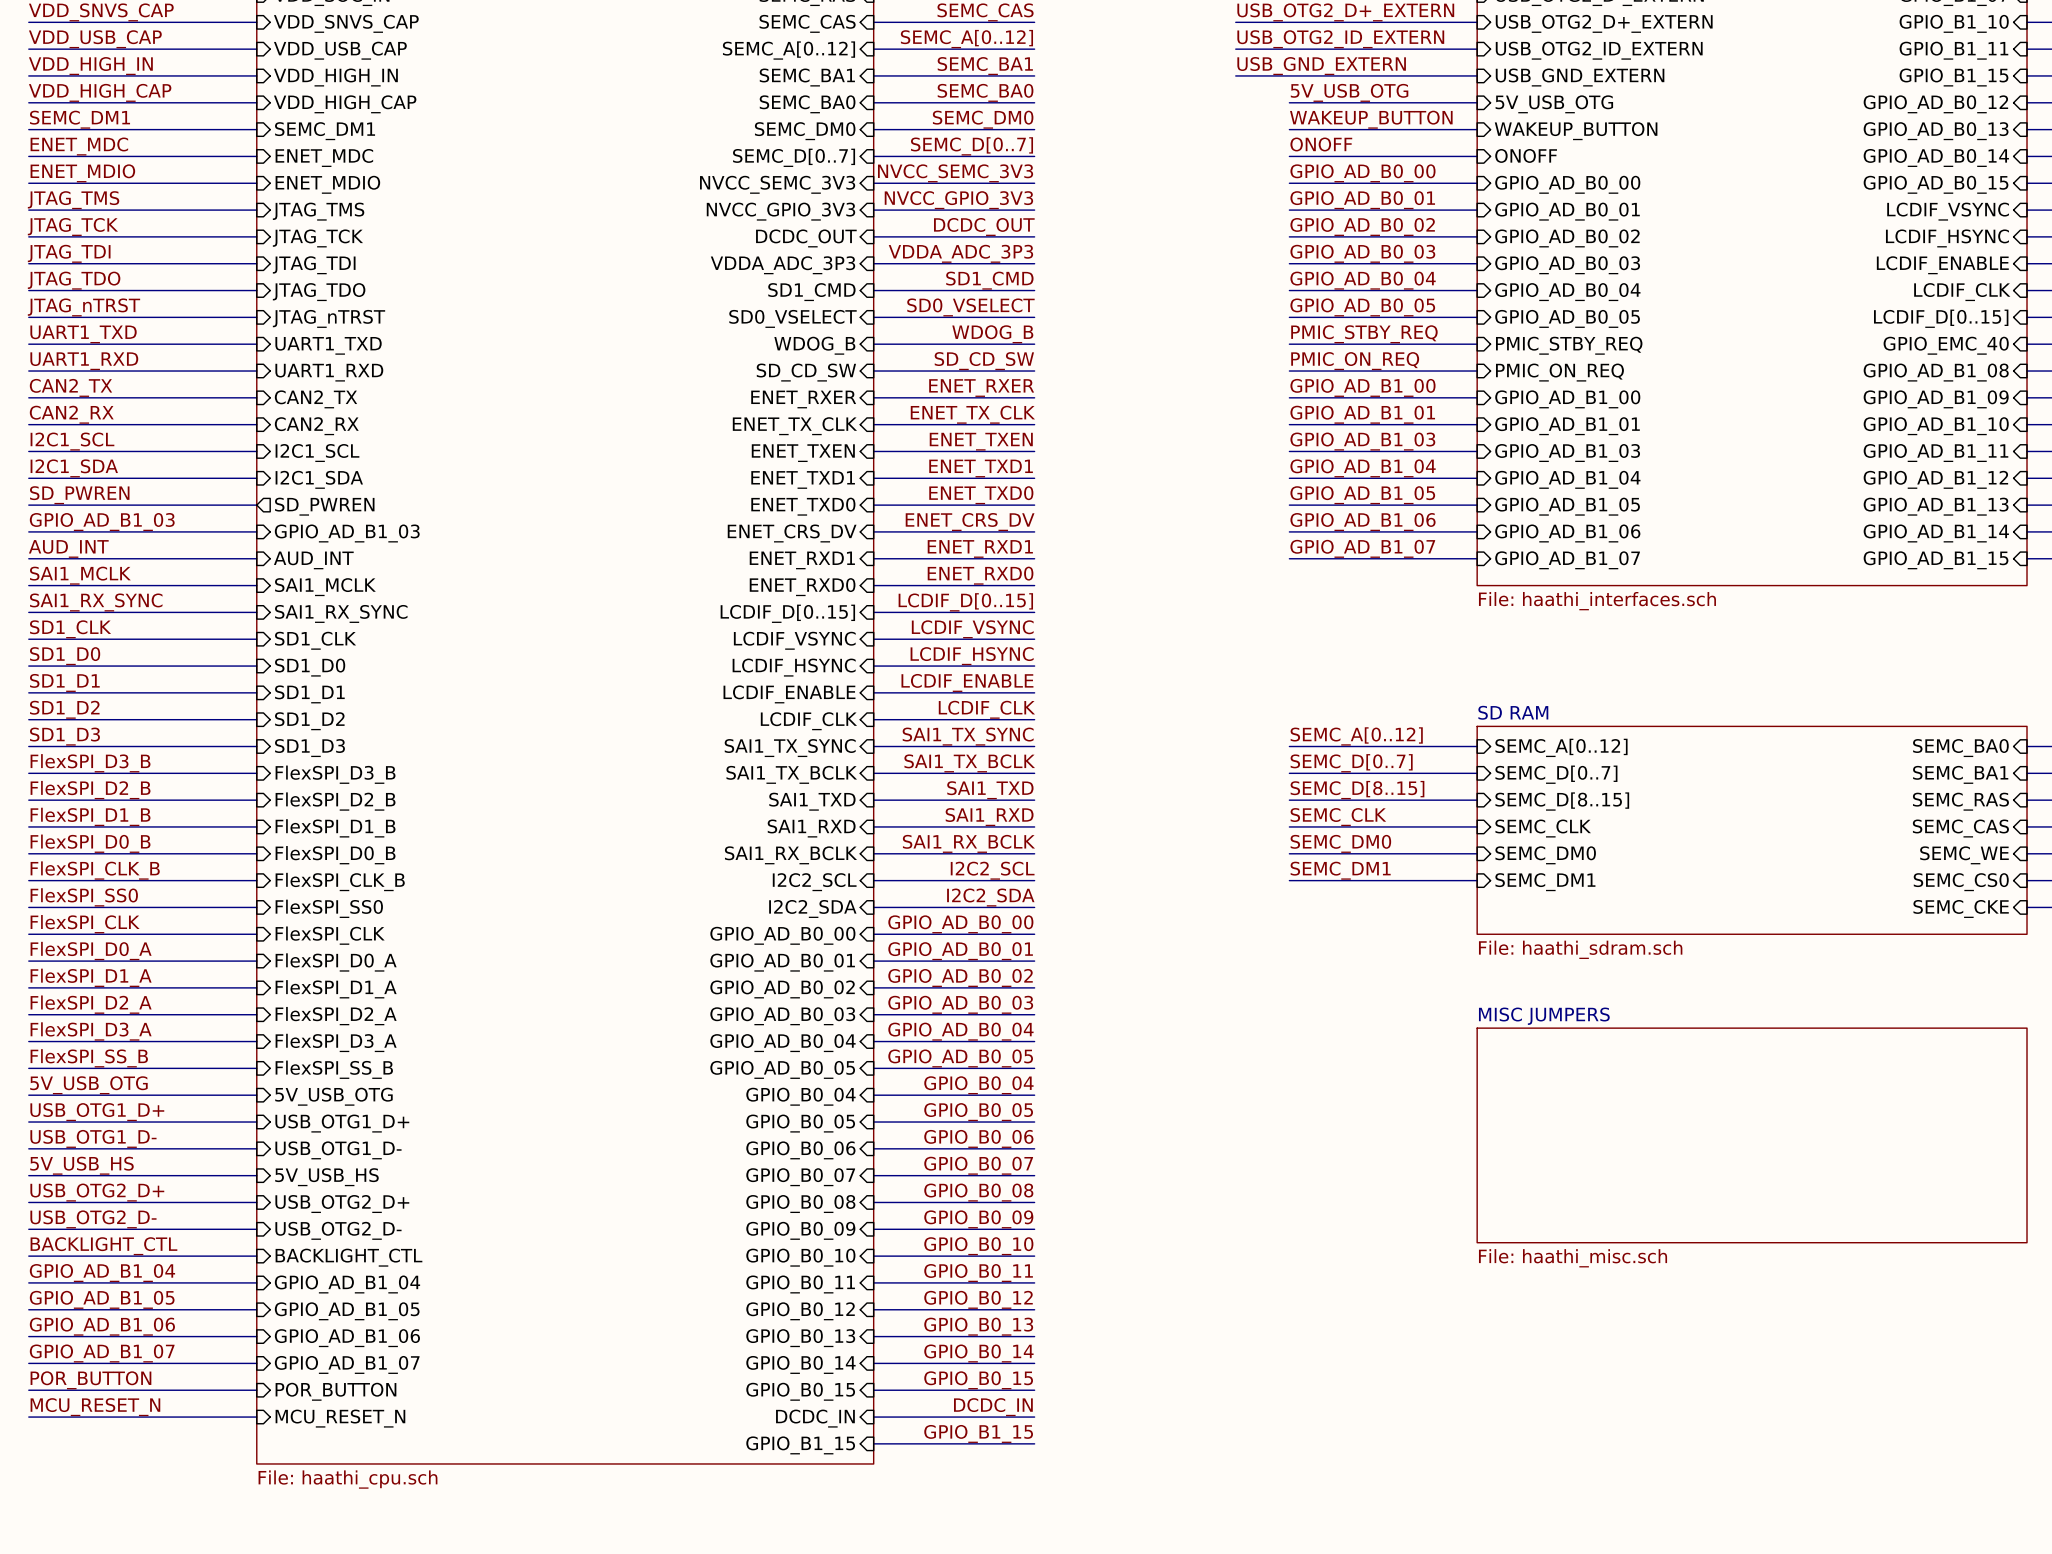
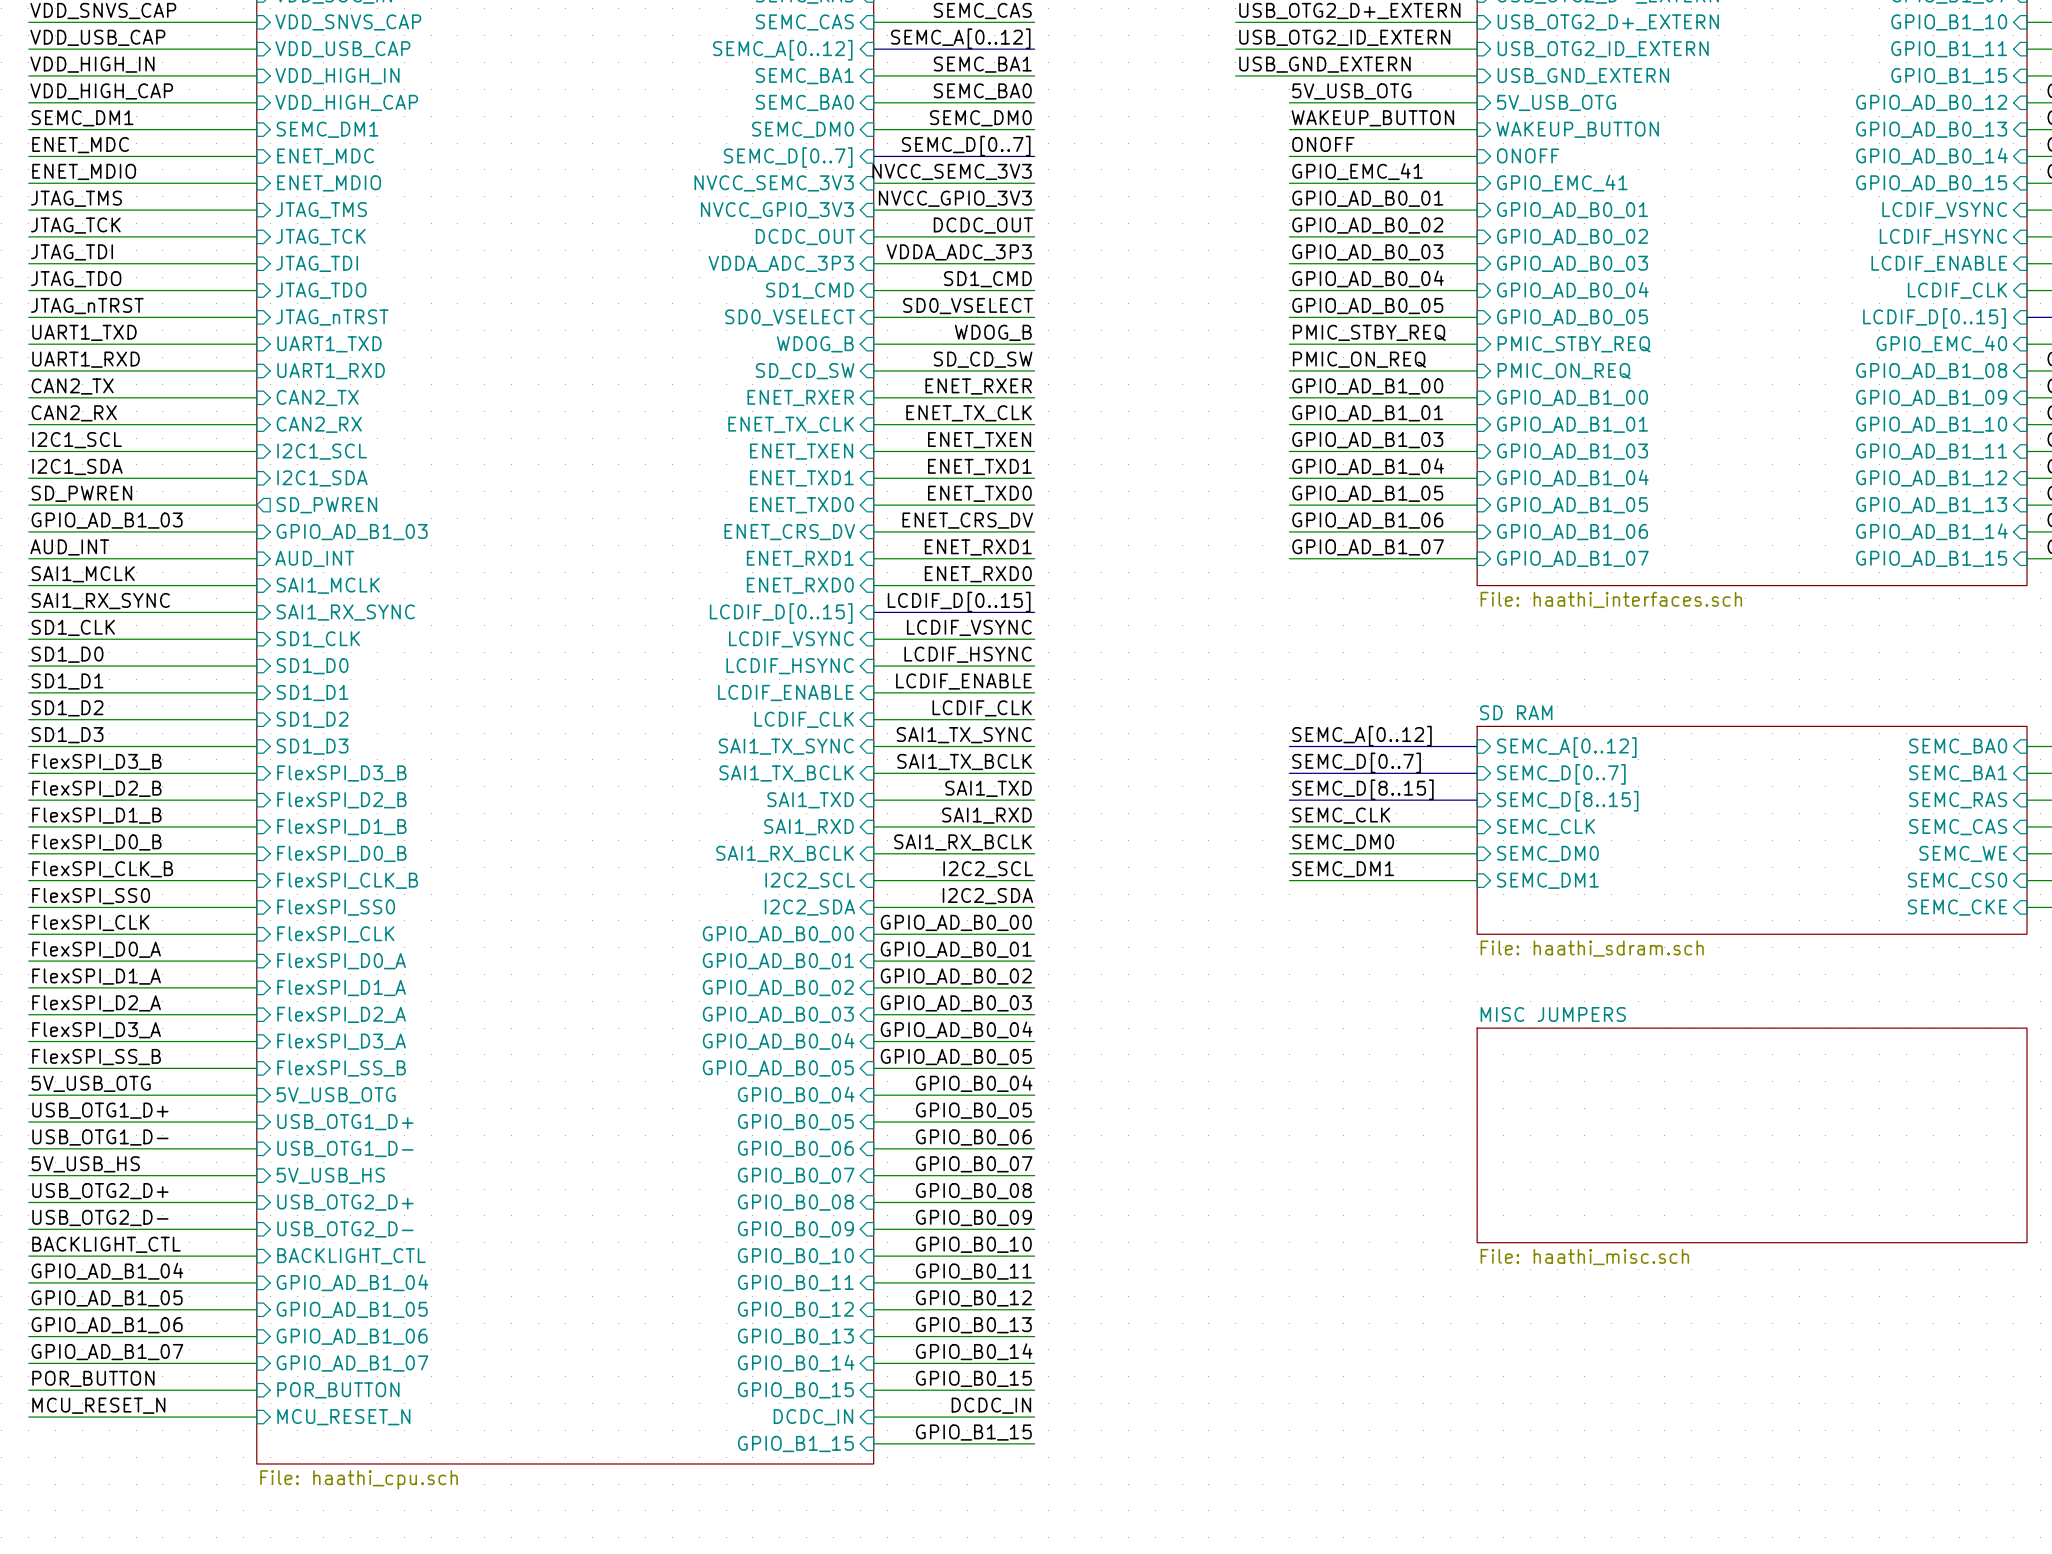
label: GPIO_AD_B0_00 (1362, 173) -> GPIO_EMC_41 (1357, 171)
sheet pin: GPIO_AD_B0_00 (1567, 184) -> GPIO_EMC_41 (1562, 183)

